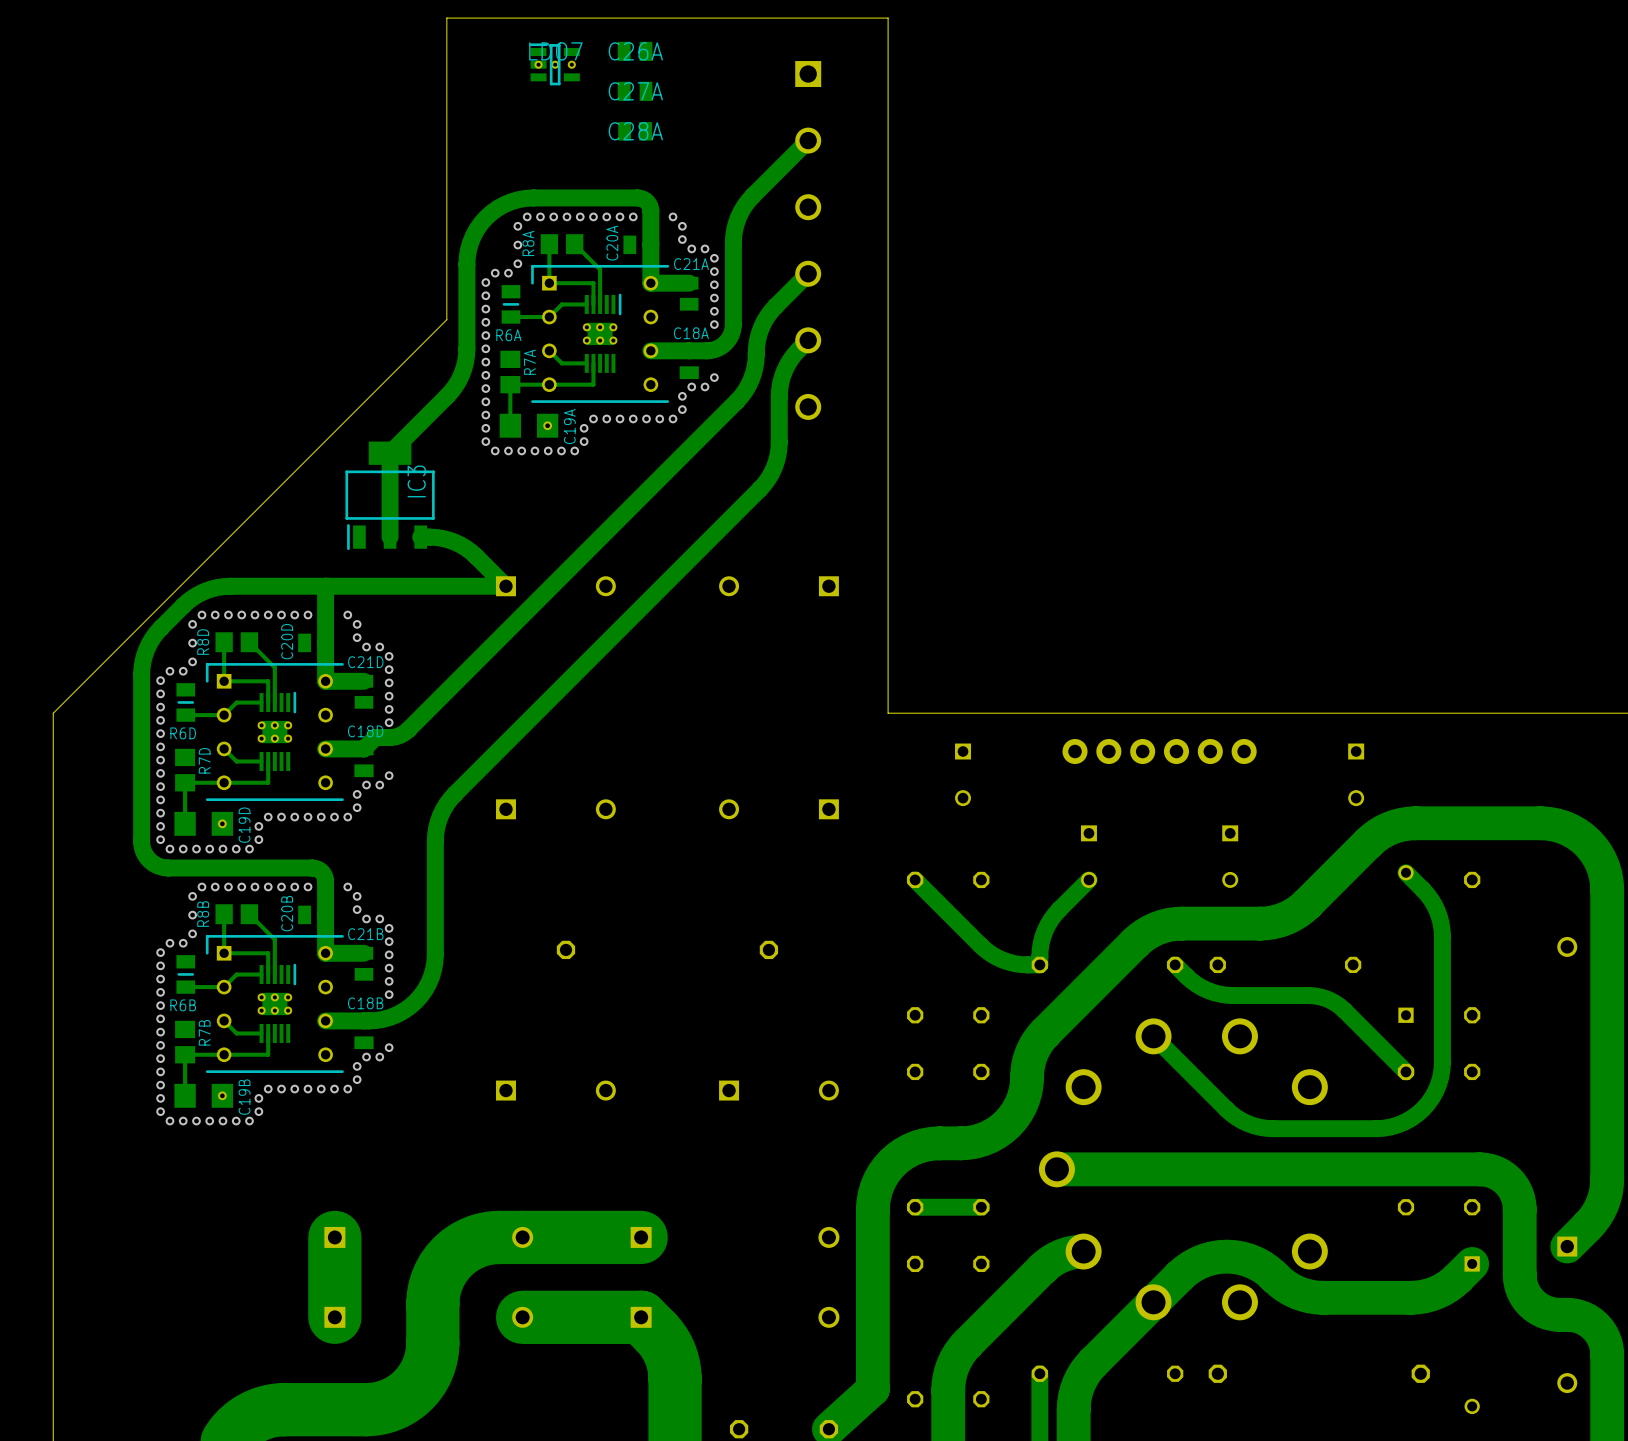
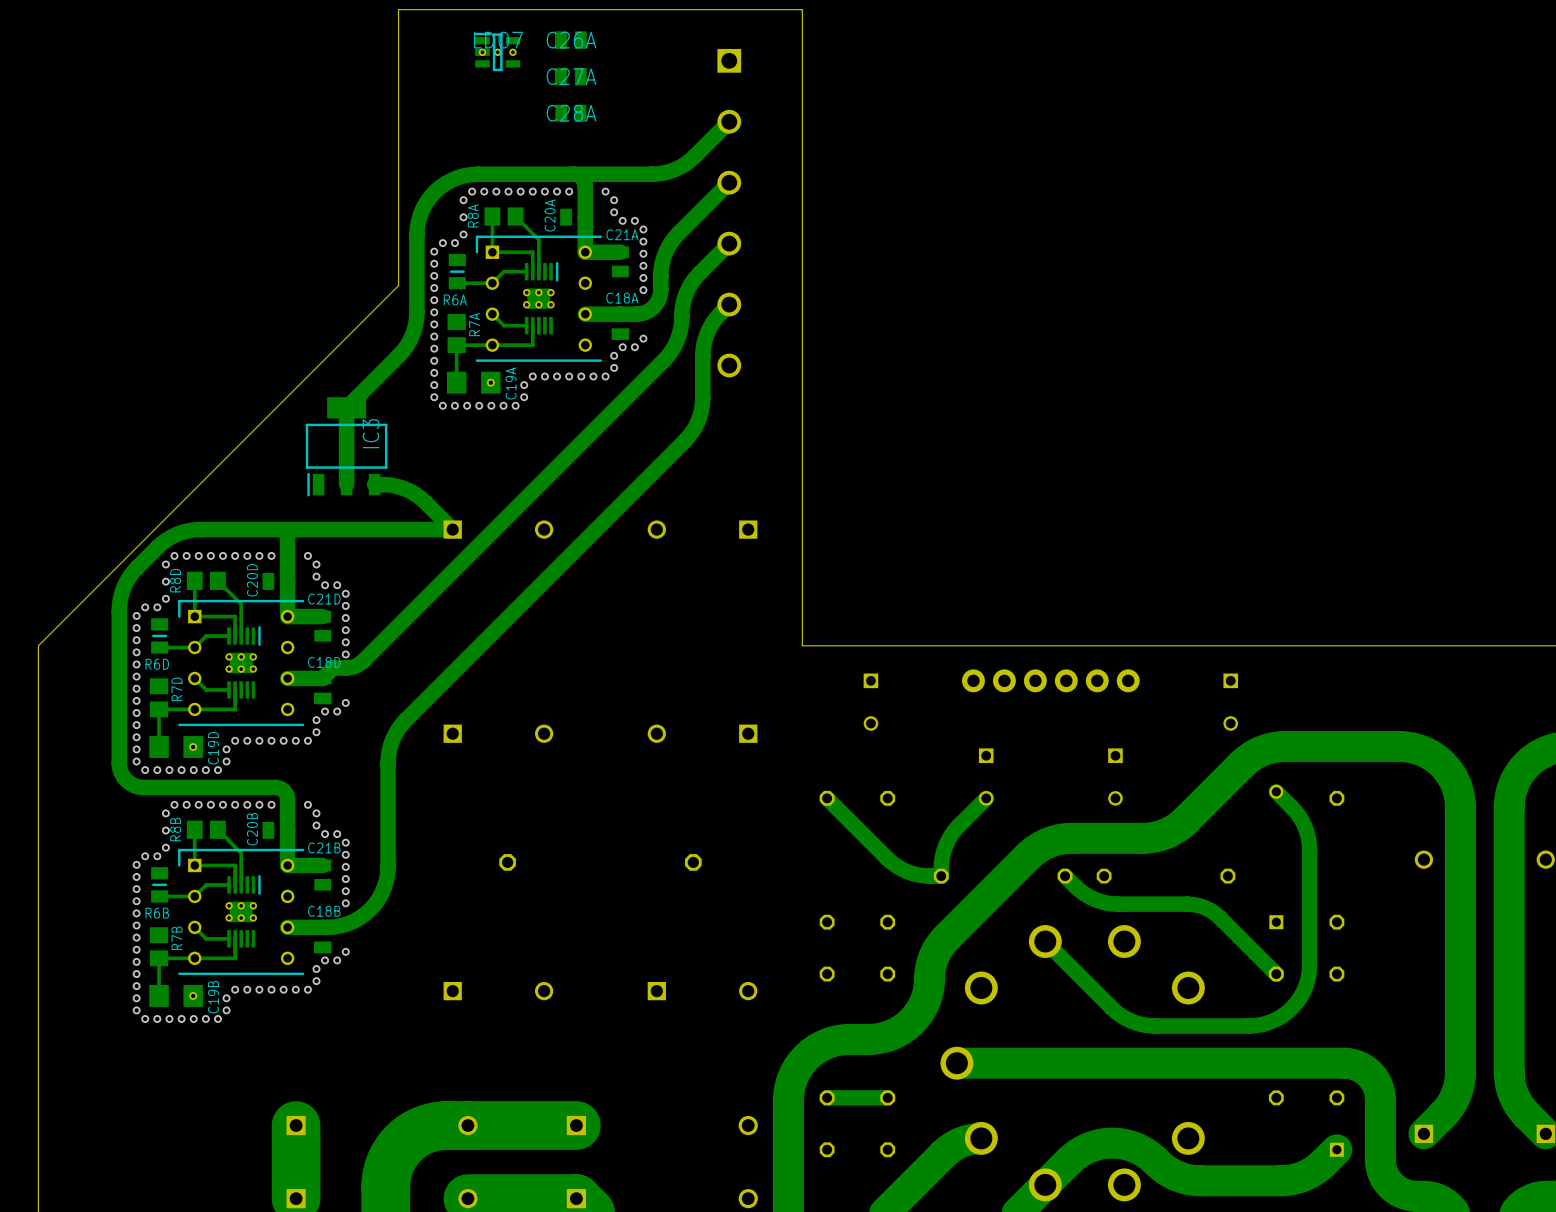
track: (770, 178) (748, 200) (736, 223) (733, 243) (733, 309) -> (729, 182) (671, 242) (663, 258) (660, 276)
track: none -> (694, 156) (674, 169) (657, 173) (573, 174)

